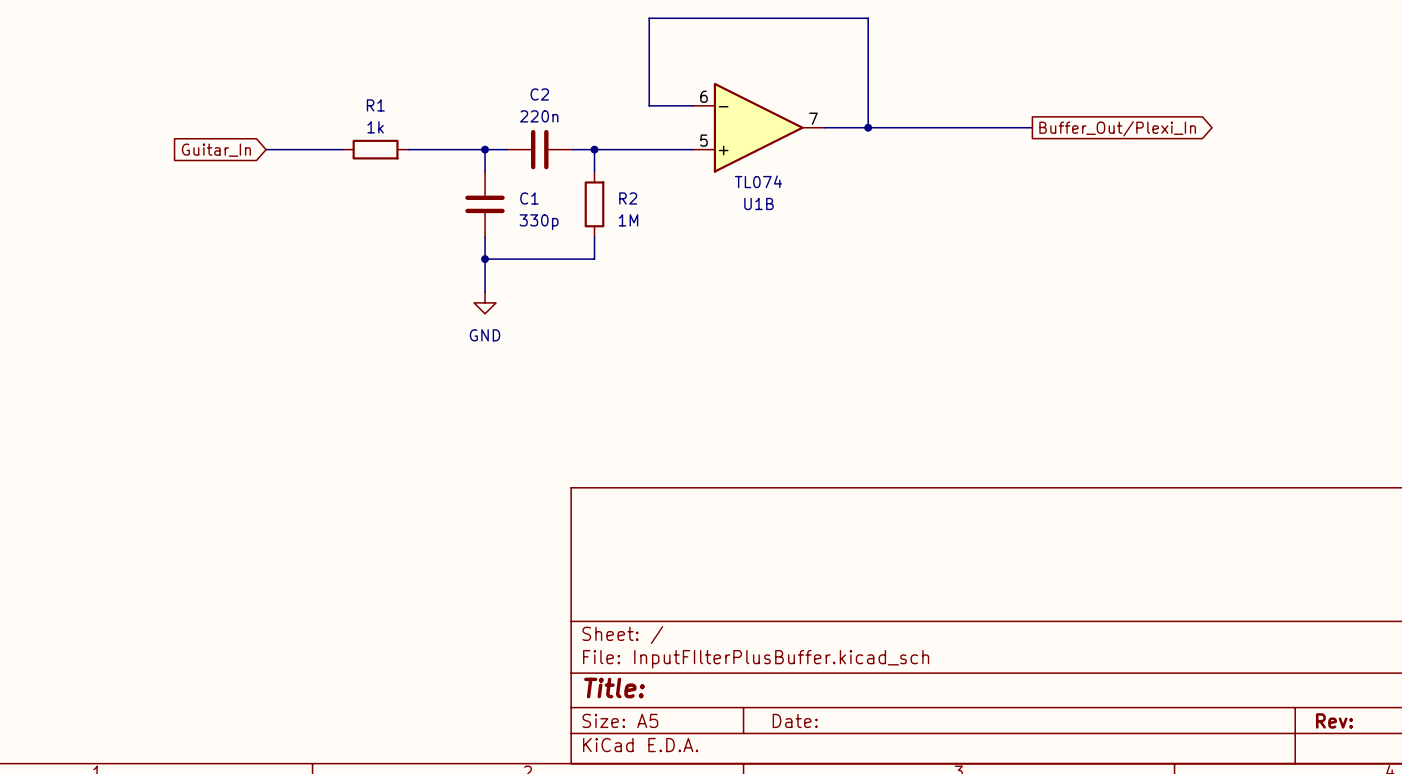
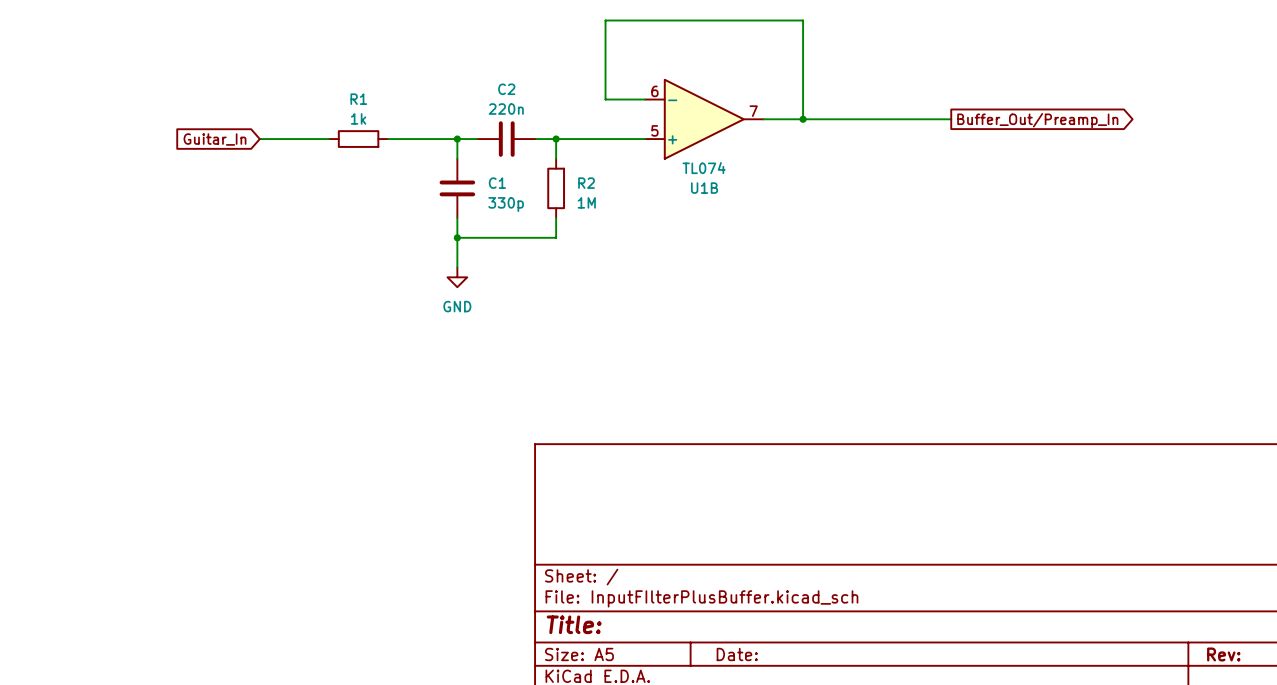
global label: Buffer_Out/Plexi_In (1117, 128) -> Buffer_Out/Preamp_In (1037, 120)

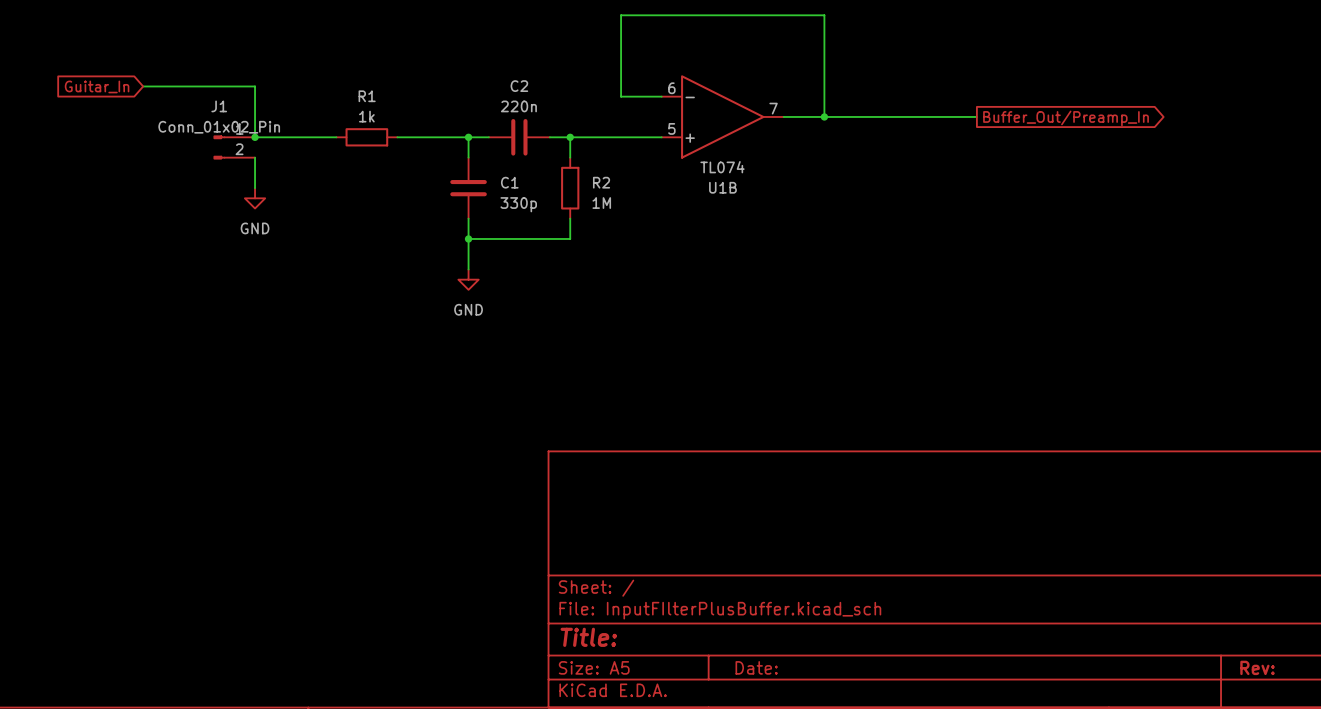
wire: none -> (143, 86) (255, 86) (255, 137) (265, 137)
global label position: Guitar_In (214, 139) -> Guitar_In (97, 86)
junction: none -> (255, 137)
J1: none -> Conn_01x02_Pin (234, 147)
wire: none -> (255, 157) (255, 188)
power symbol: none -> GND (255, 198)

